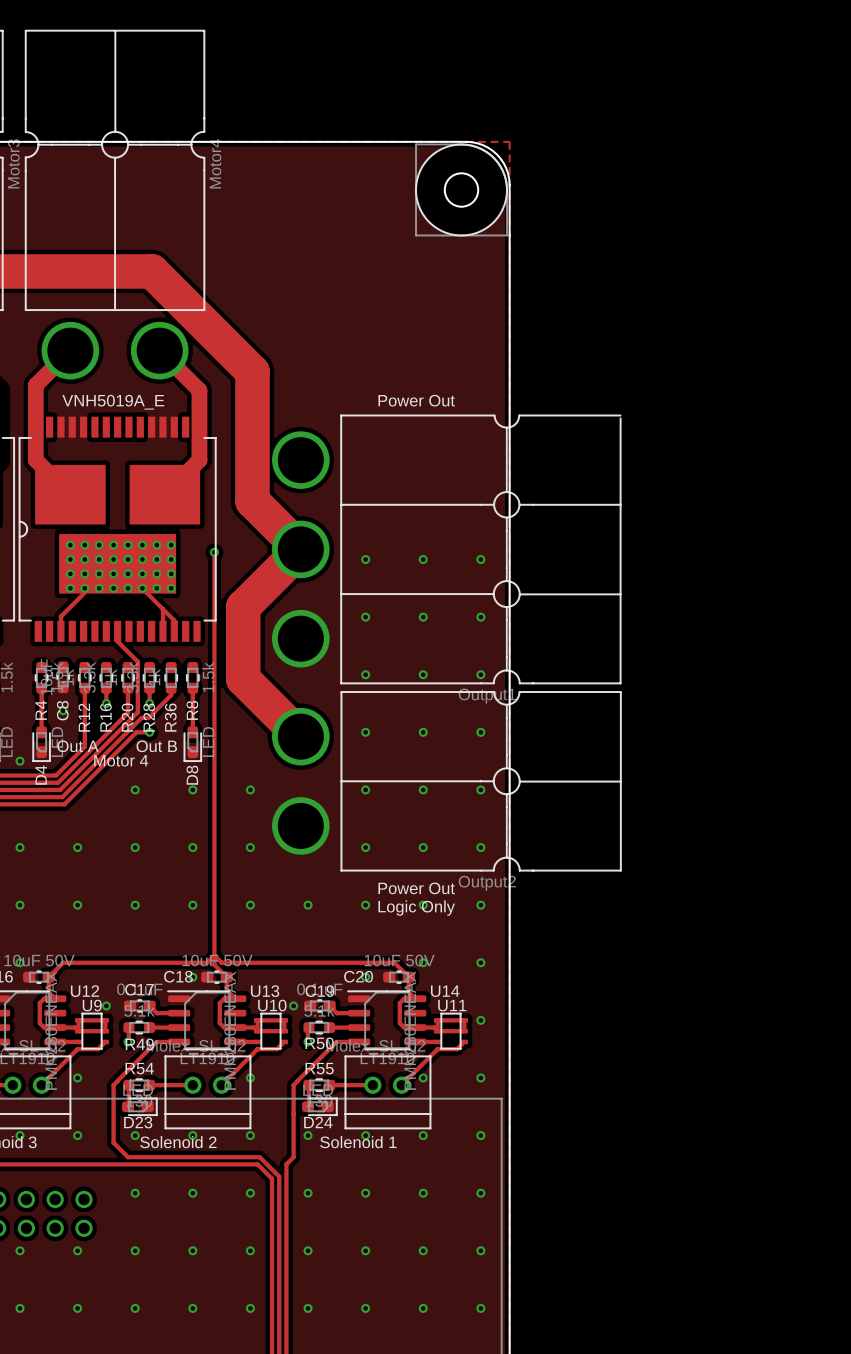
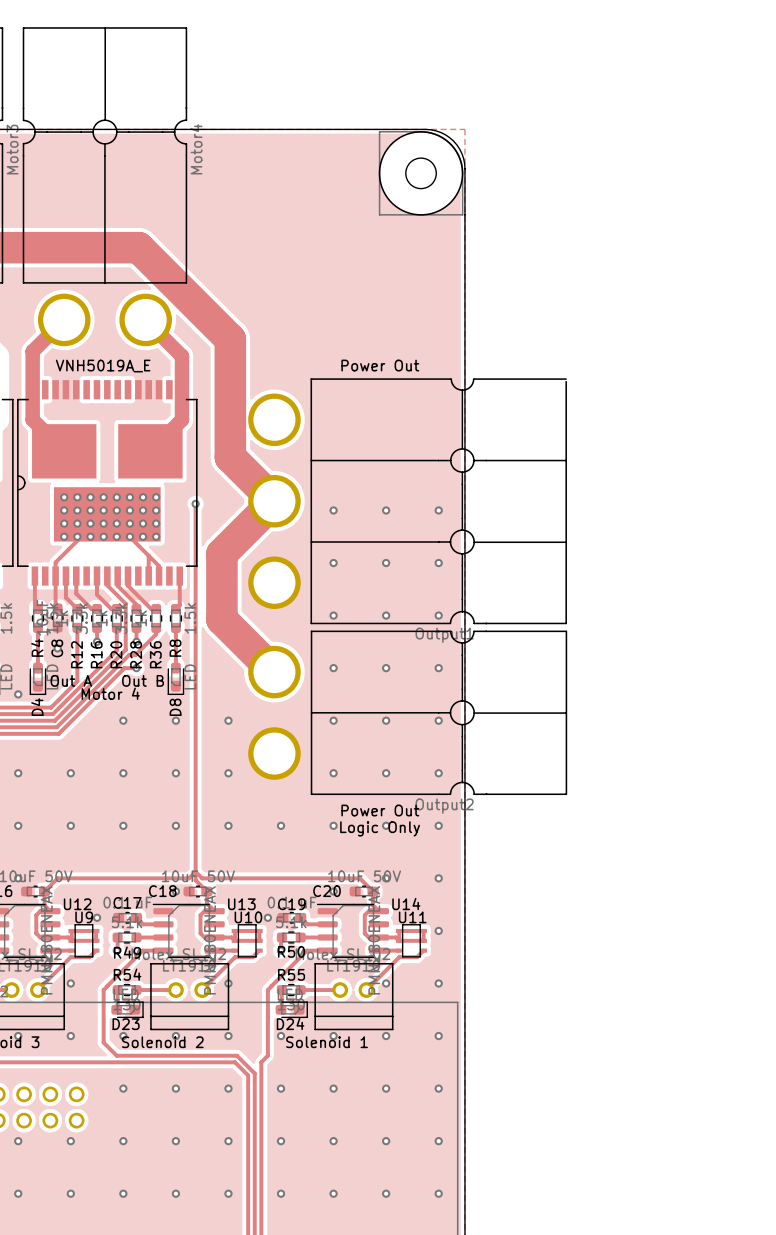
track: none -> (34, 576) (34, 605) (37, 609)
track: none -> (55, 576) (55, 606) (57, 609)
track: none -> (65, 576) (65, 597) (77, 609)
track: none -> (76, 576) (76, 593) (91, 609) (97, 609)
track: none -> (96, 576) (96, 594) (111, 609) (116, 609)
track: none -> (117, 576) (117, 585) (136, 604) (136, 609)
track: none -> (128, 576) (128, 585) (151, 609) (156, 609)
track: none -> (179, 576) (179, 605) (175, 609)

